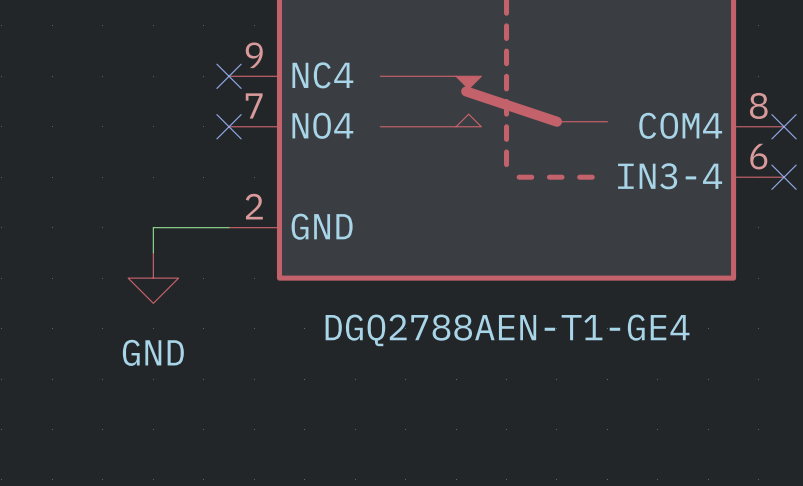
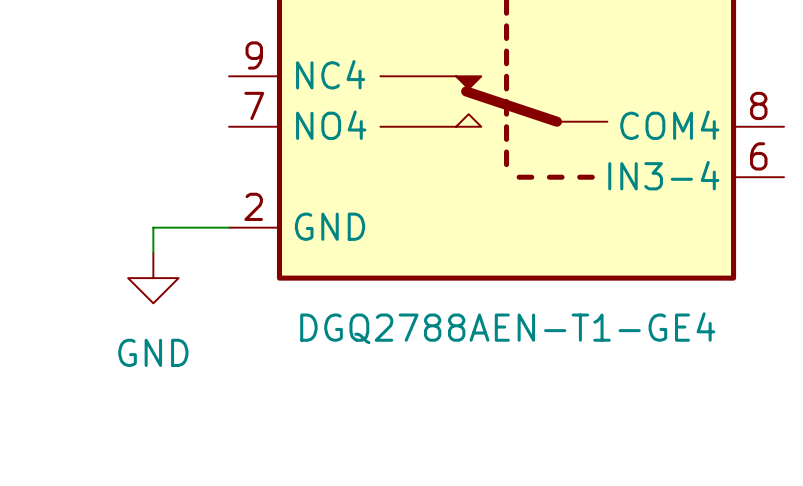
no-connect mark: (229, 76) -> none
no-connect mark: (229, 126) -> none
no-connect mark: (784, 126) -> none
no-connect mark: (784, 177) -> none

